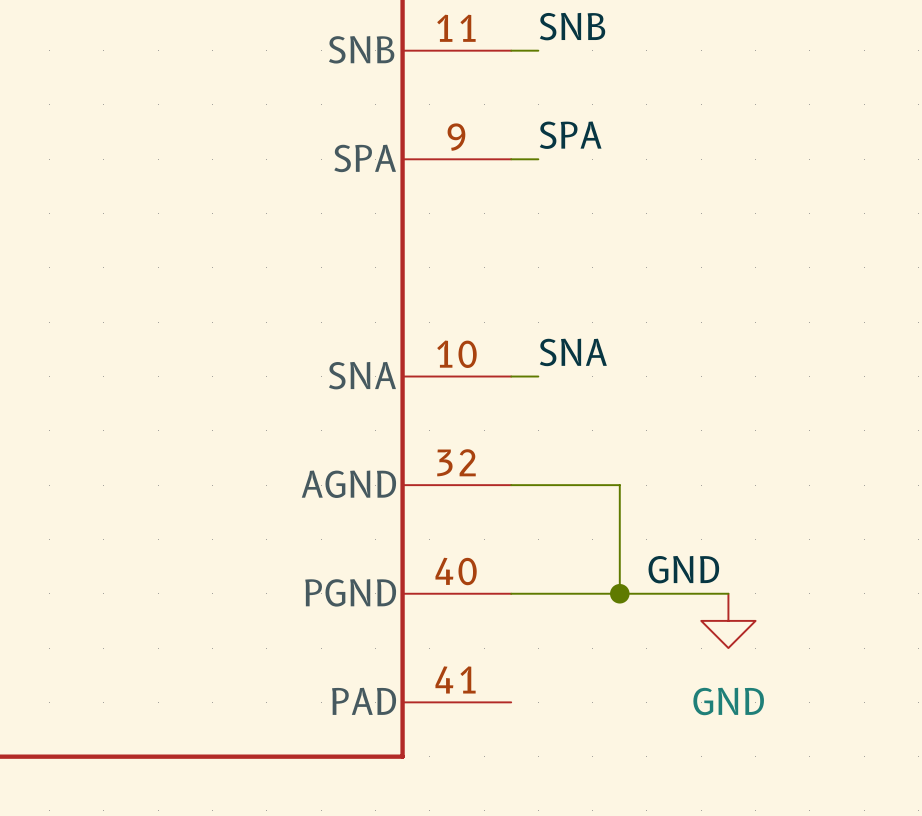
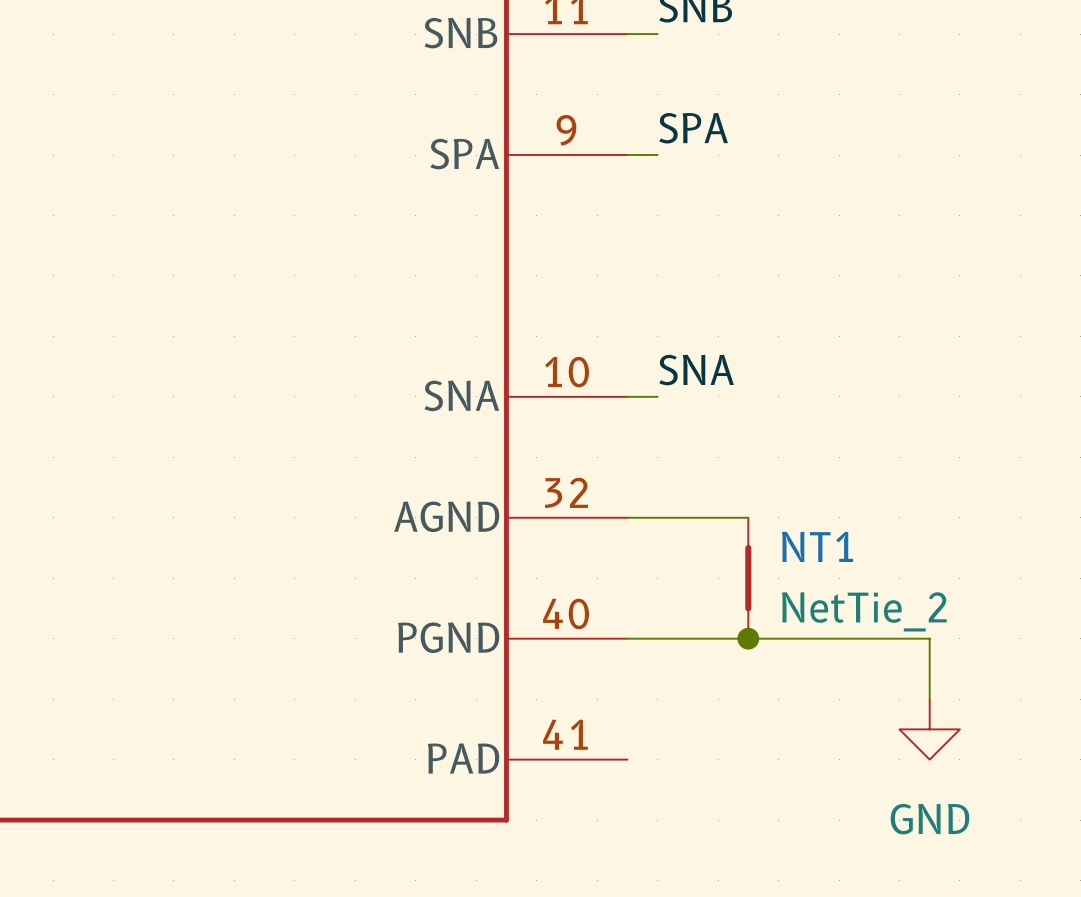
NT1: none -> NetTie_2 (748, 578)
label: GND (683, 569) -> none
wire: none -> (869, 638) (929, 638) (929, 699)
power symbol position: GND (728, 620) -> GND (929, 729)

